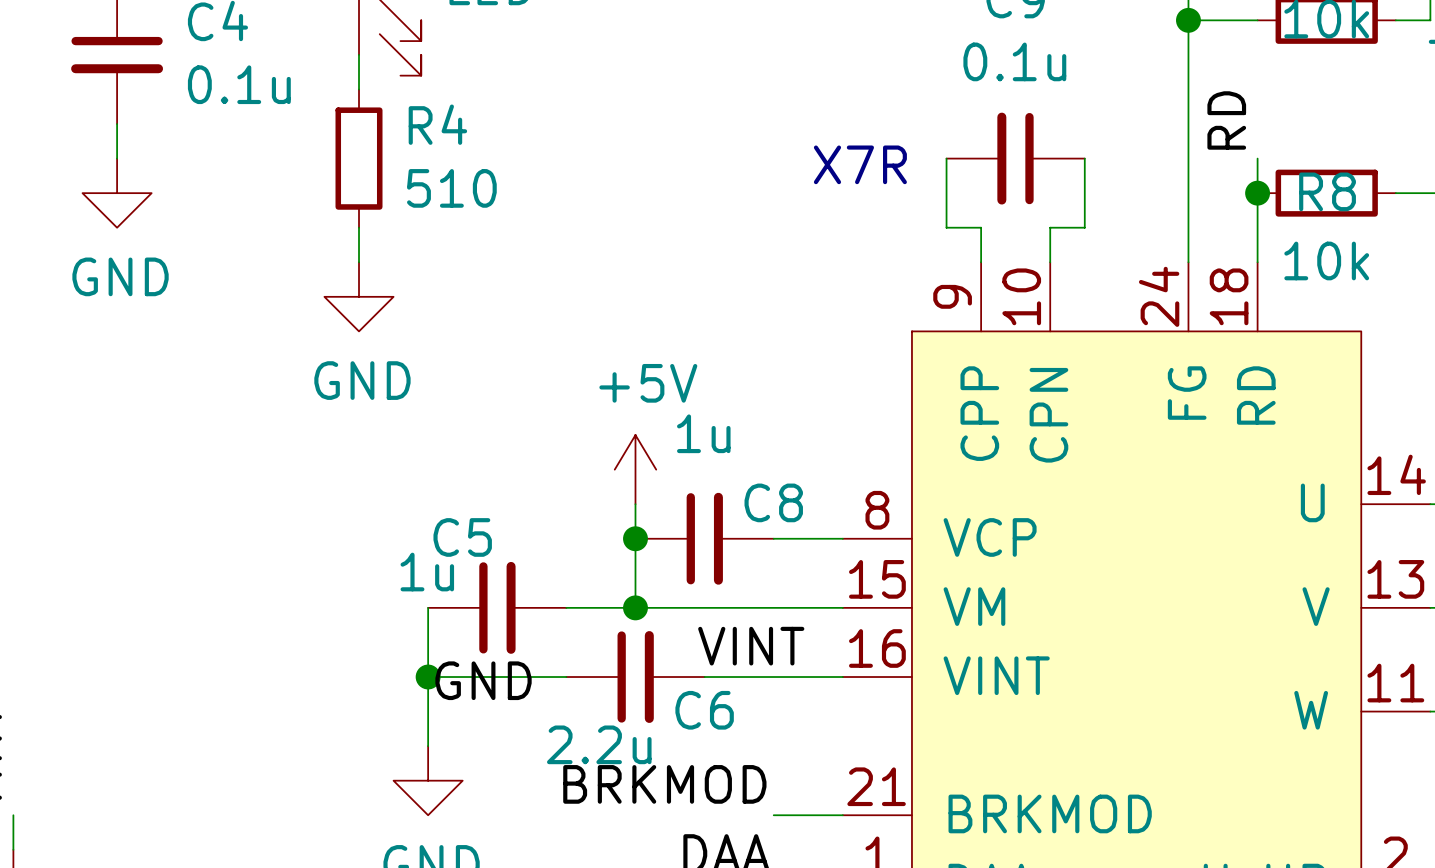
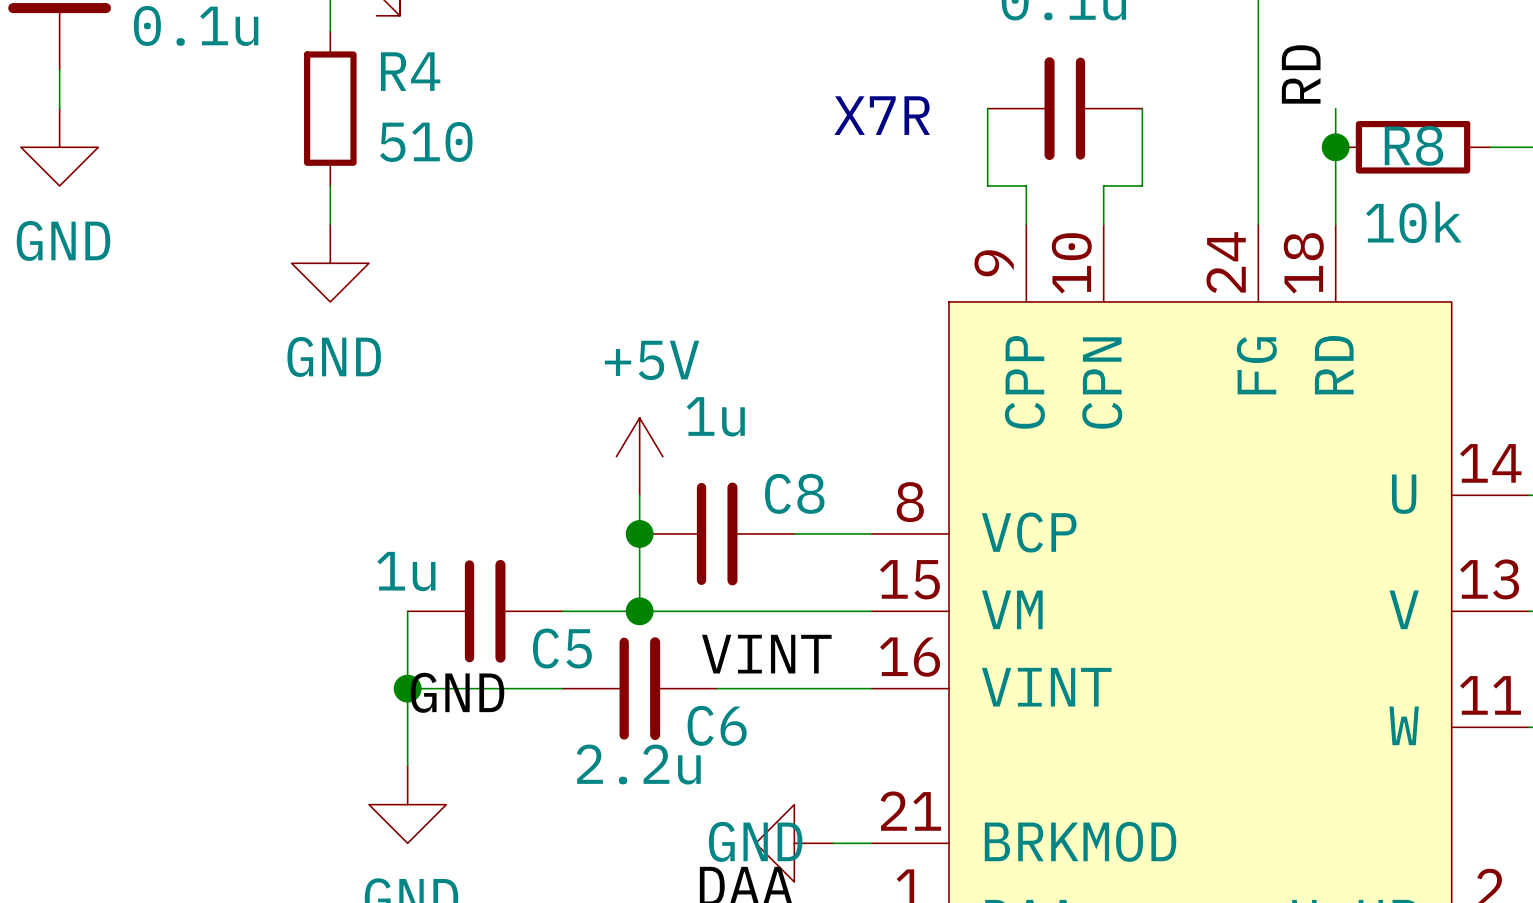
C5 name position: C5 (462, 537) -> C5 (562, 648)
C6 value position: 2.2u (599, 744) -> 2.2u (638, 764)
label: BRKMOD (664, 784) -> none
power symbol: none -> GND (794, 843)

